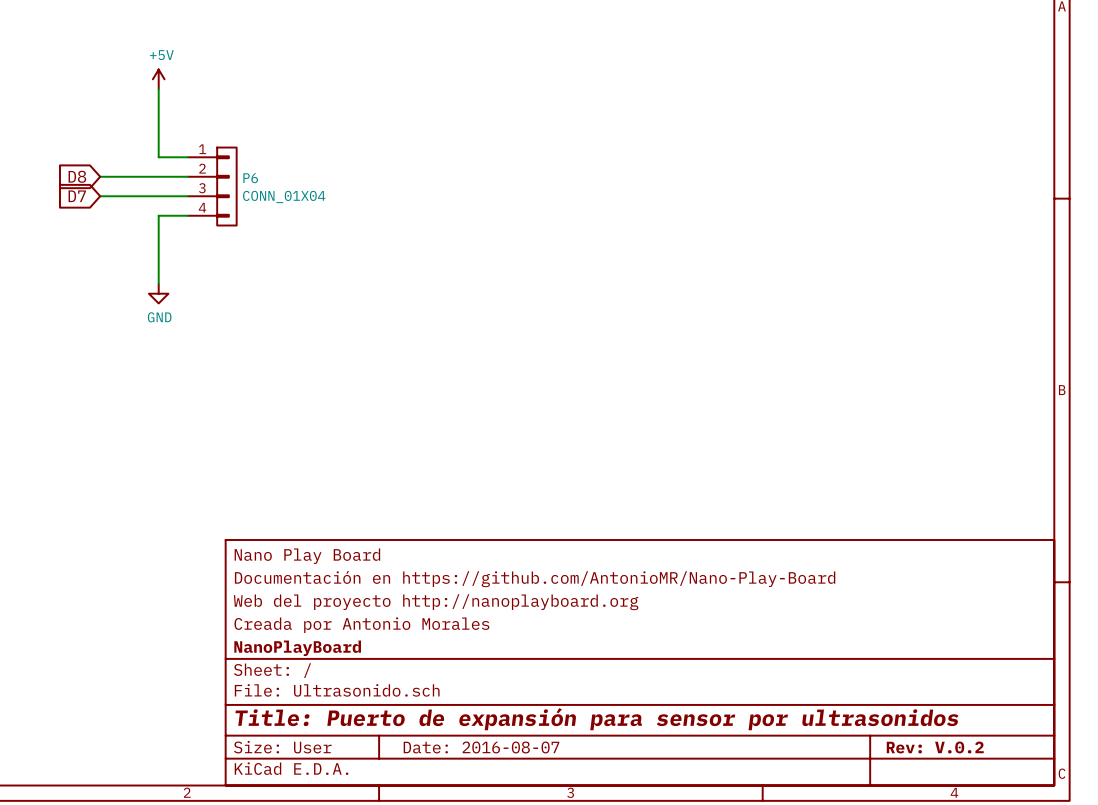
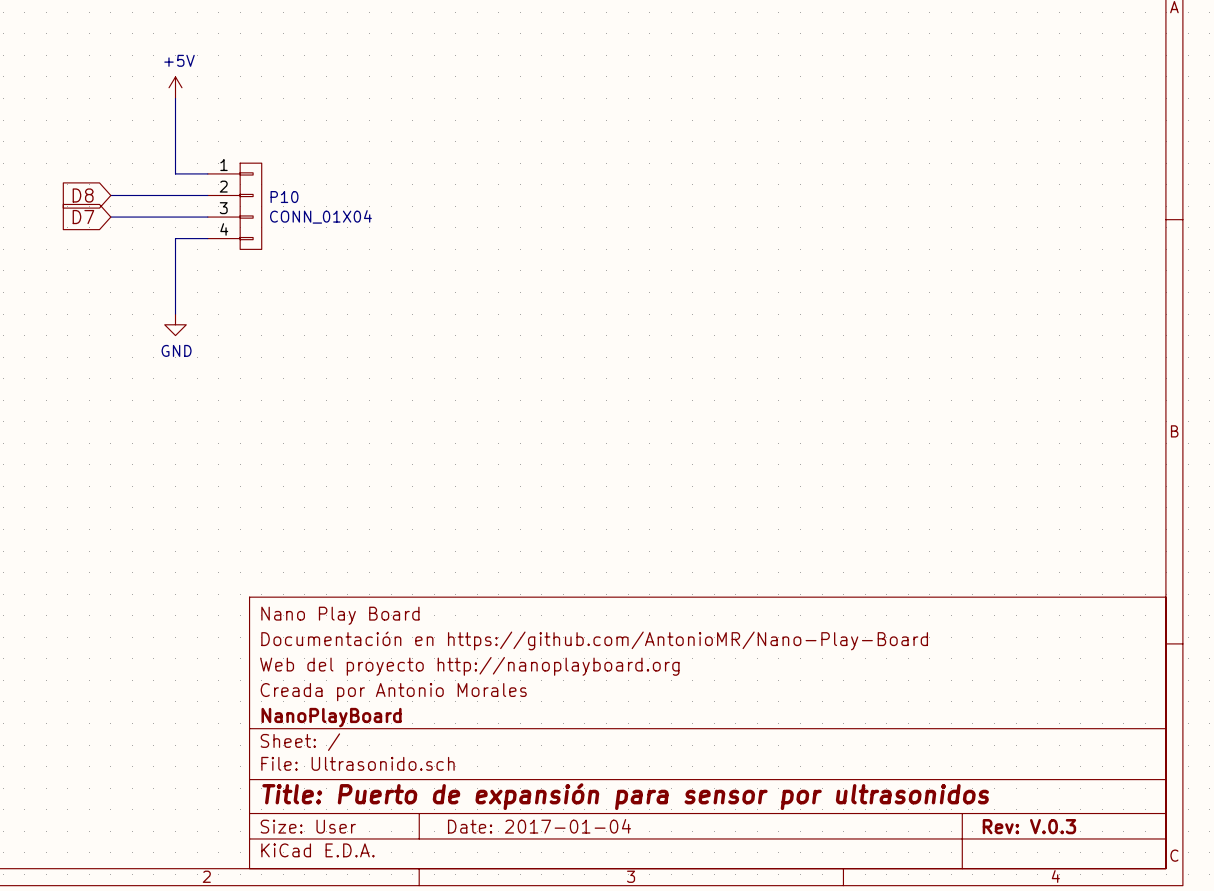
P6 name: P6 (250, 178) -> P10 (284, 197)
title block: Date: 2016-08-07 (481, 747) -> Date: 2017-01-04 (539, 826)
title block: Rev: V.0.2 (935, 747) -> Rev: V.0.3 (1029, 826)

